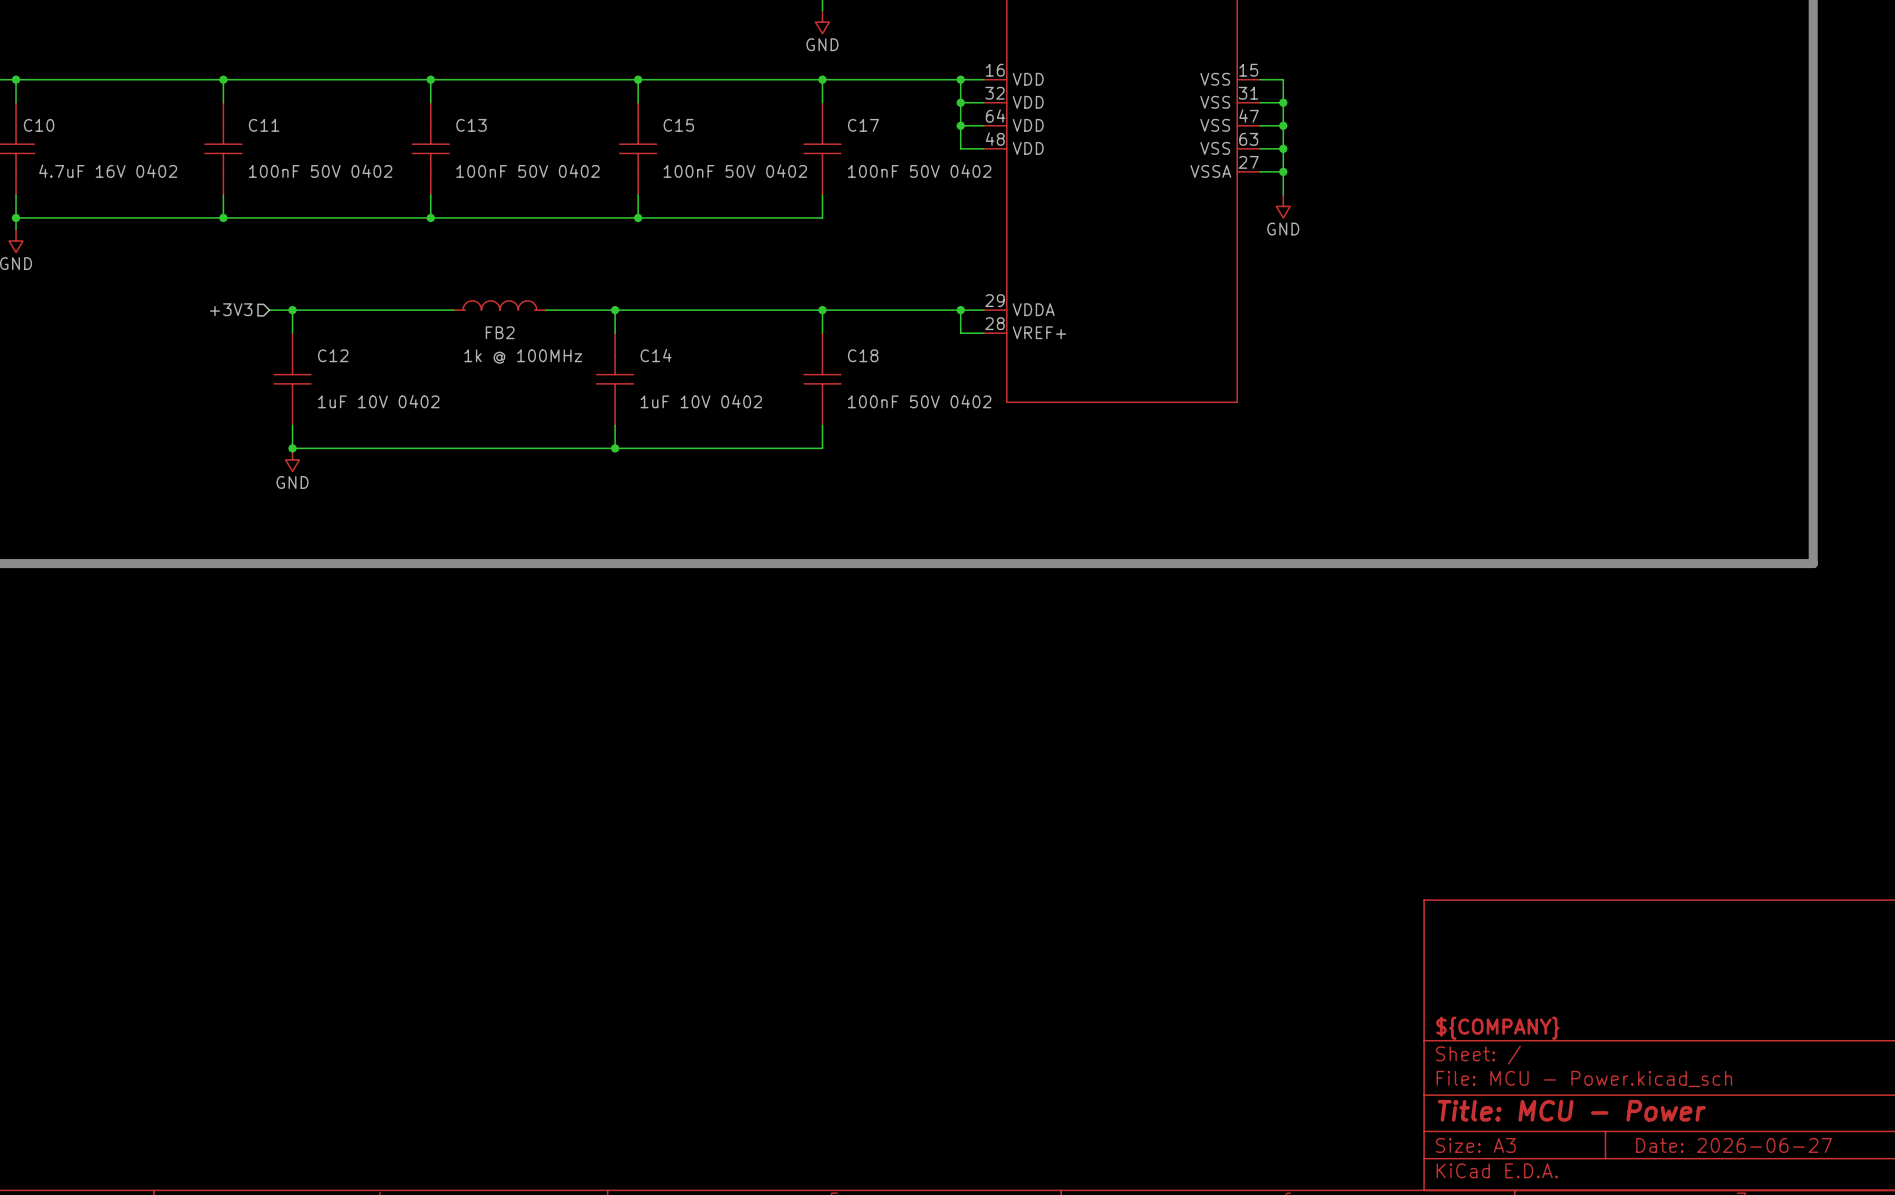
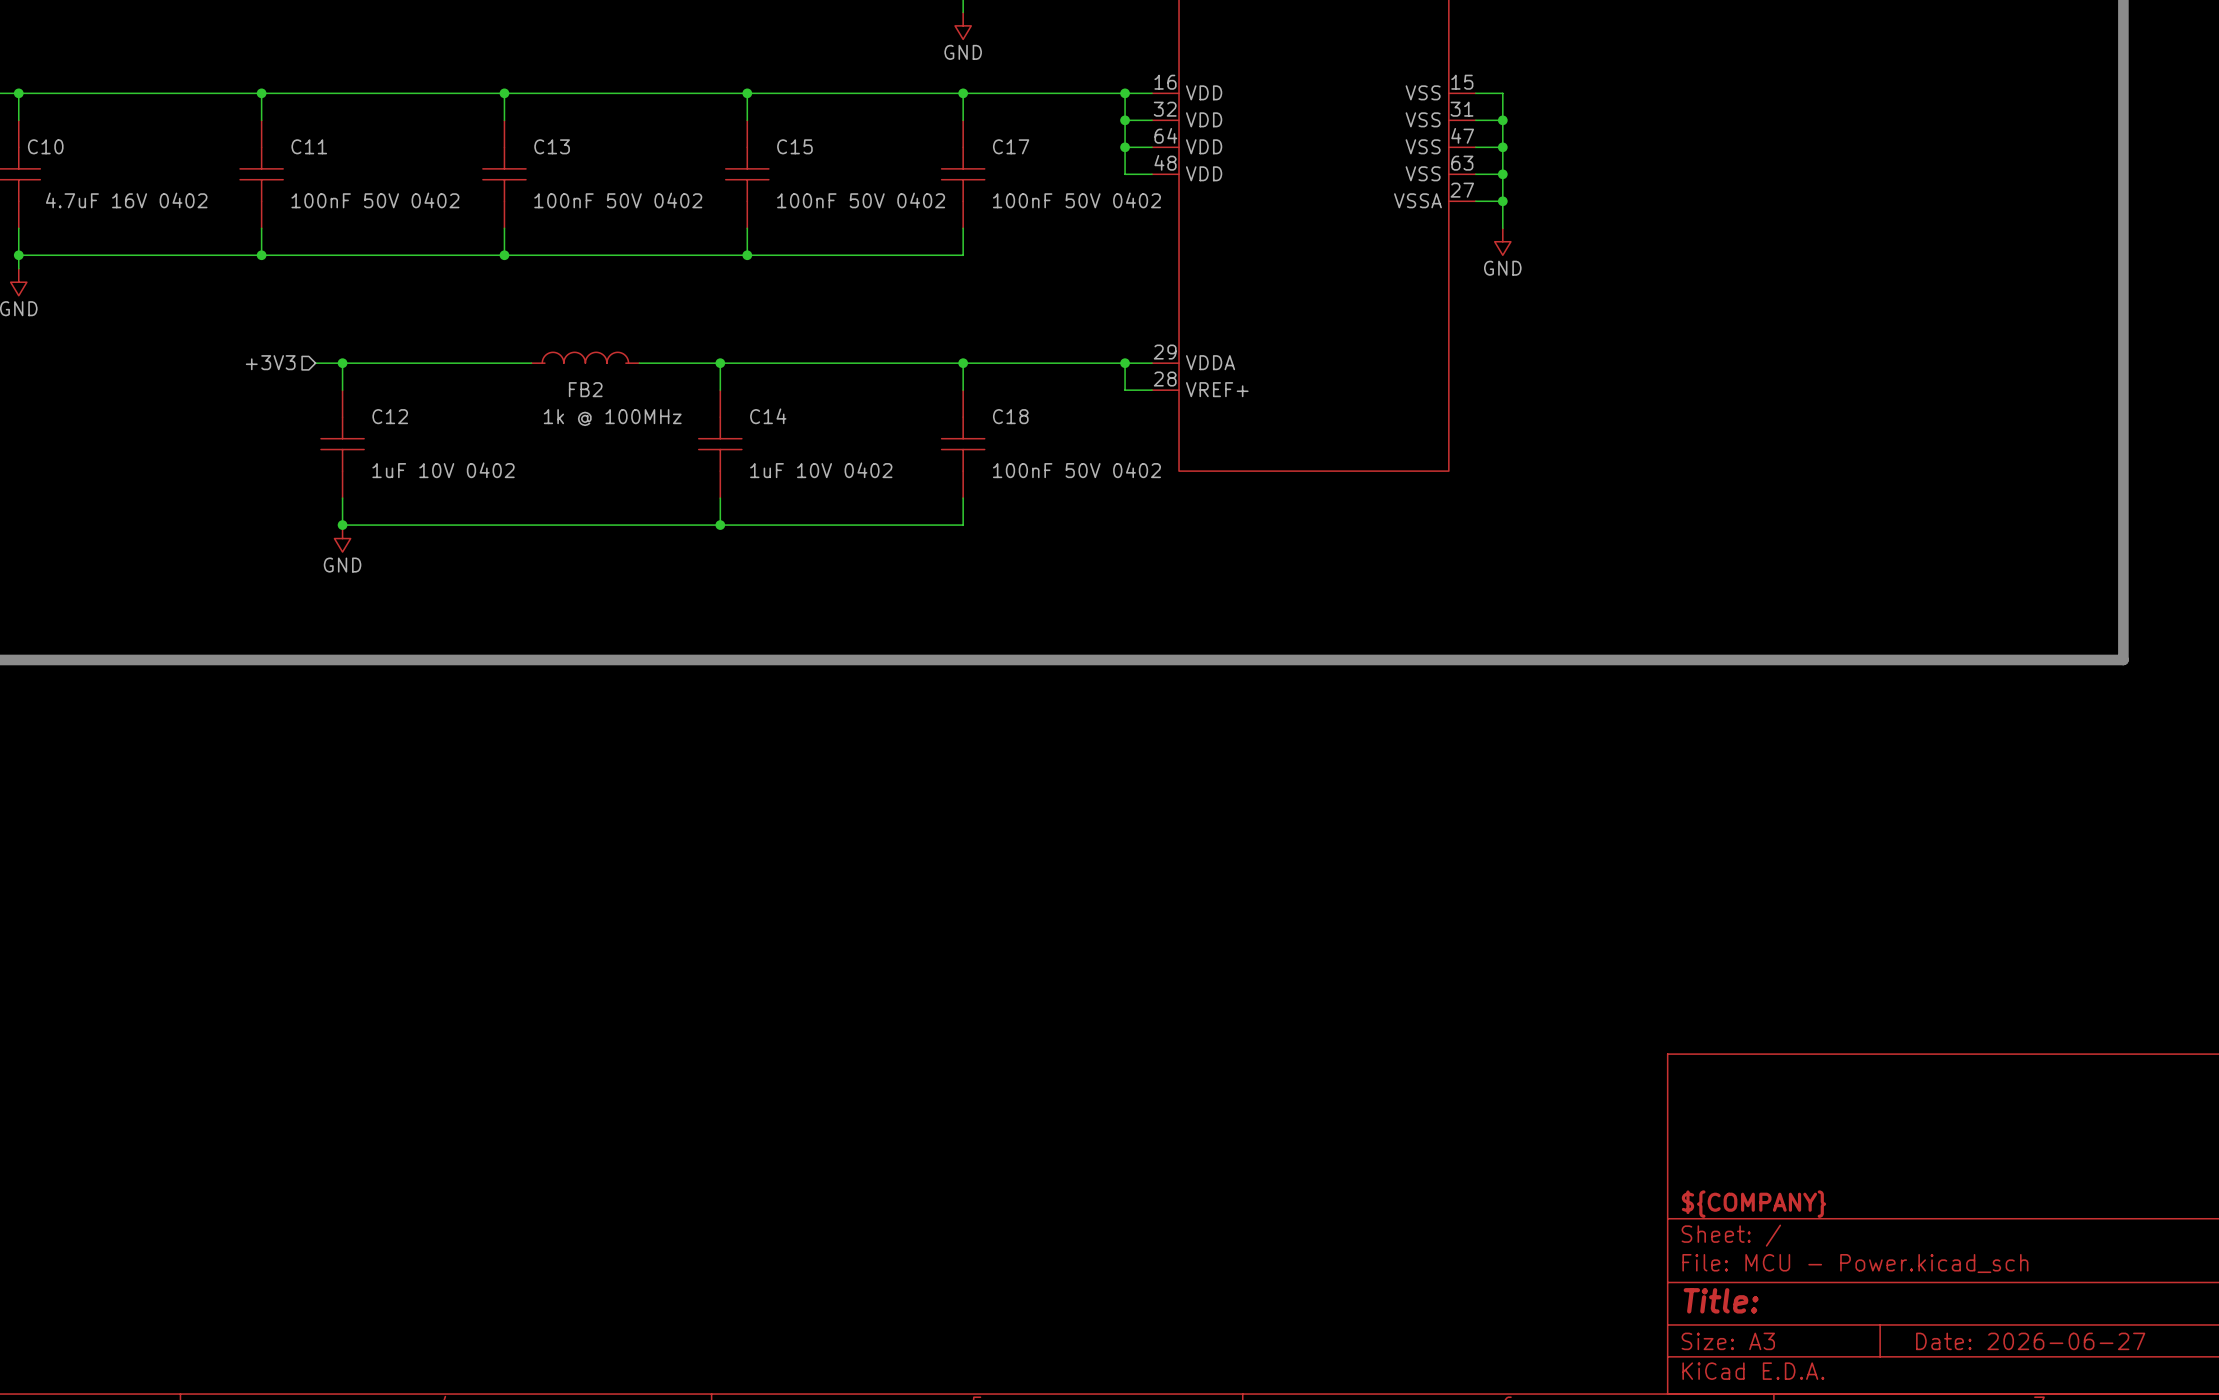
title block: Title: MCU - Power (1571, 1110) -> Title: (1721, 1300)

